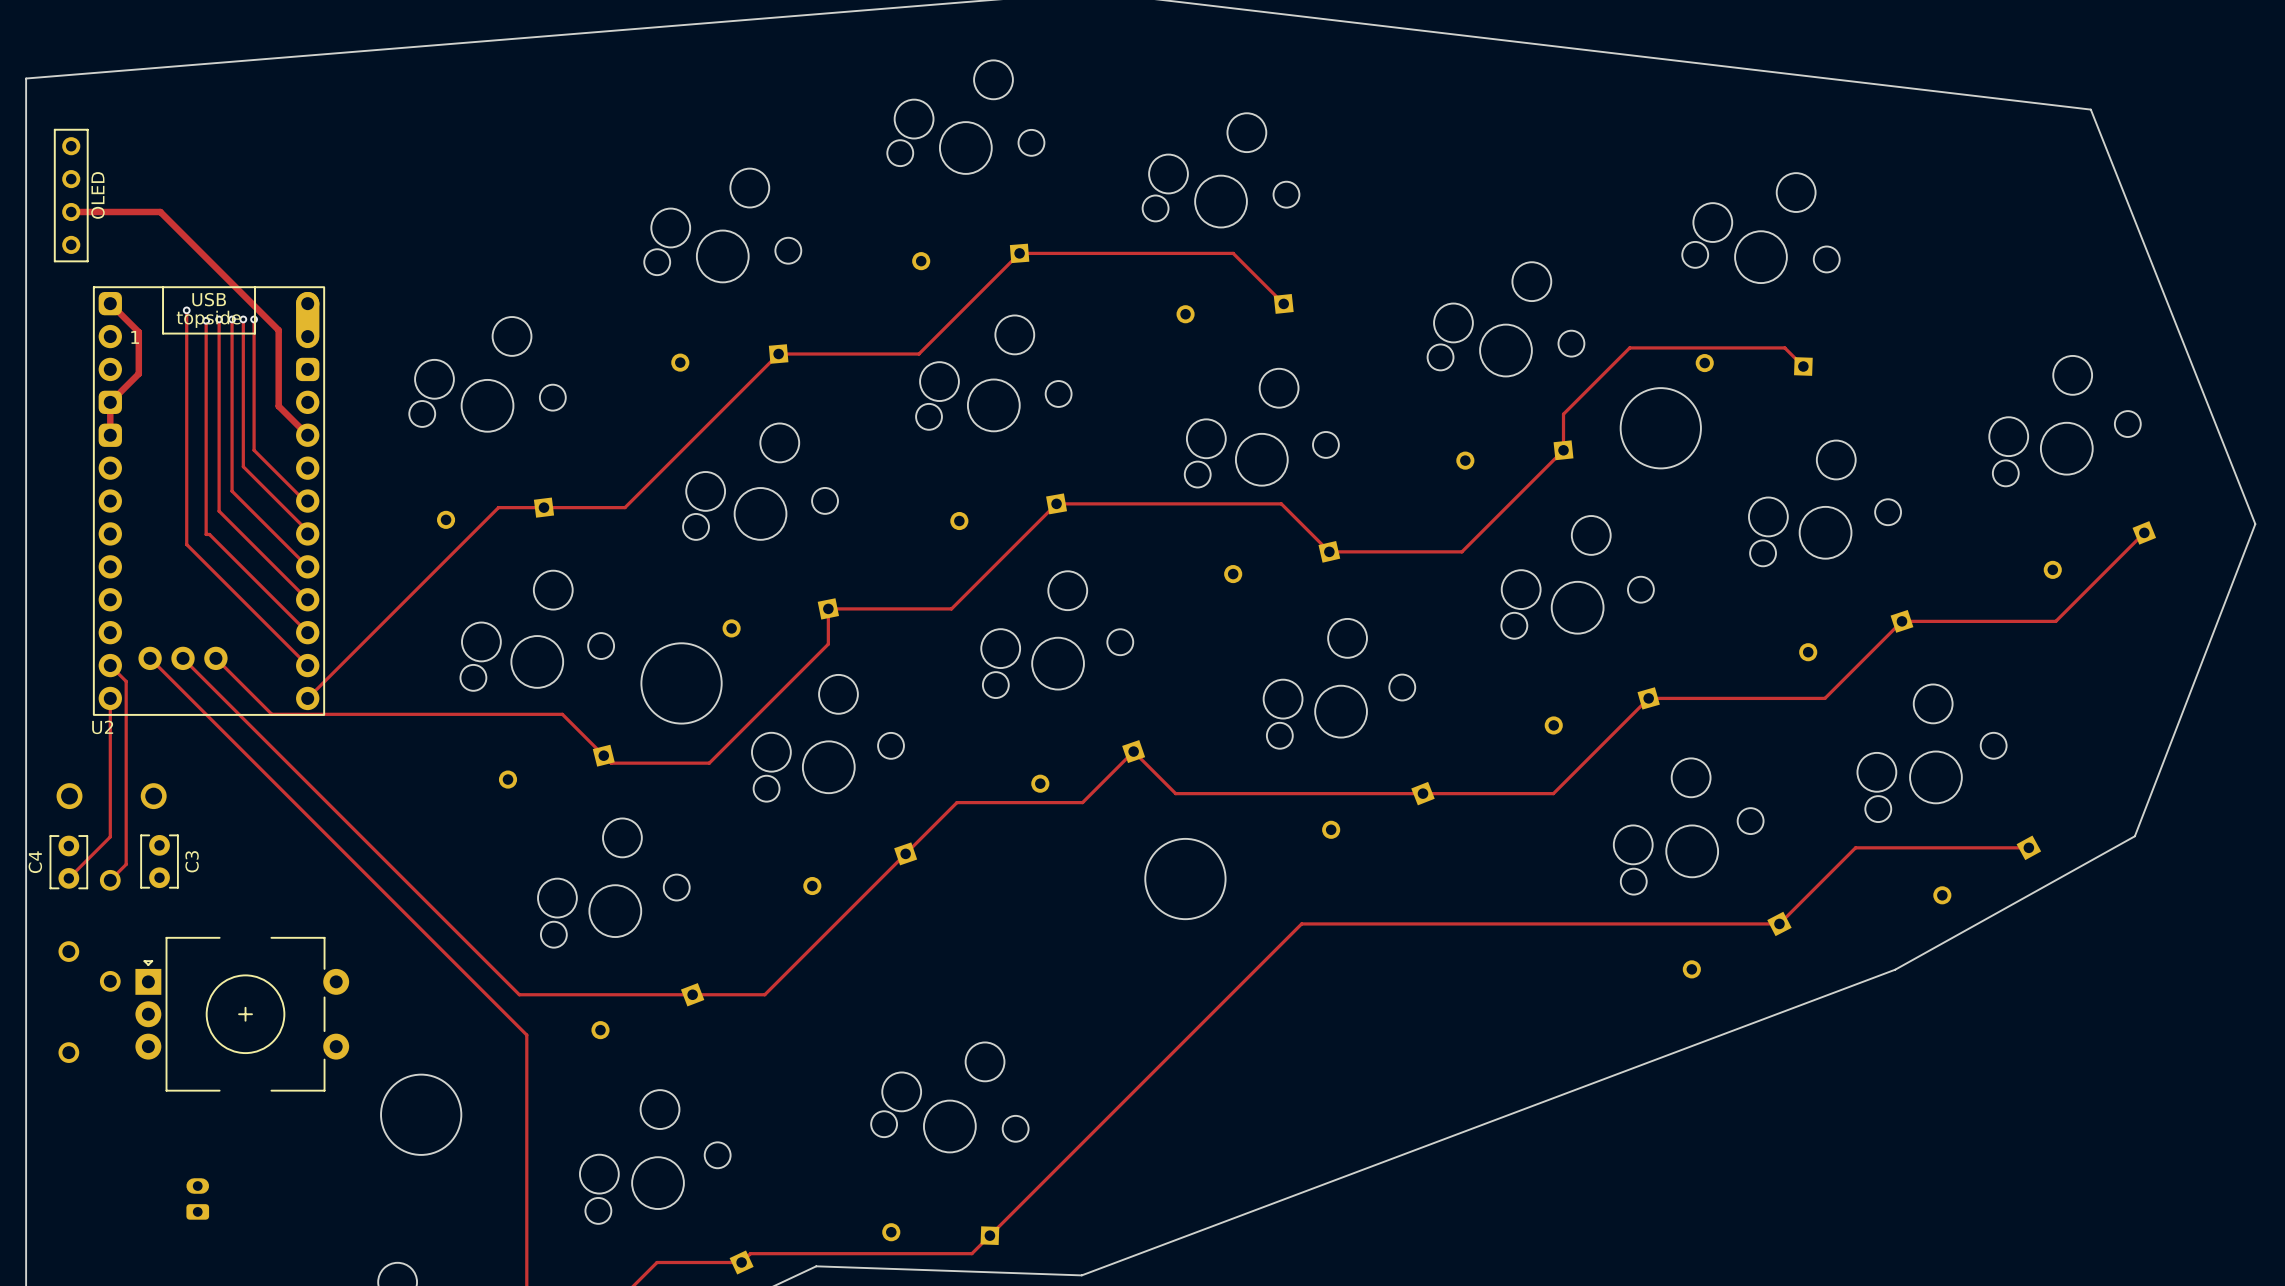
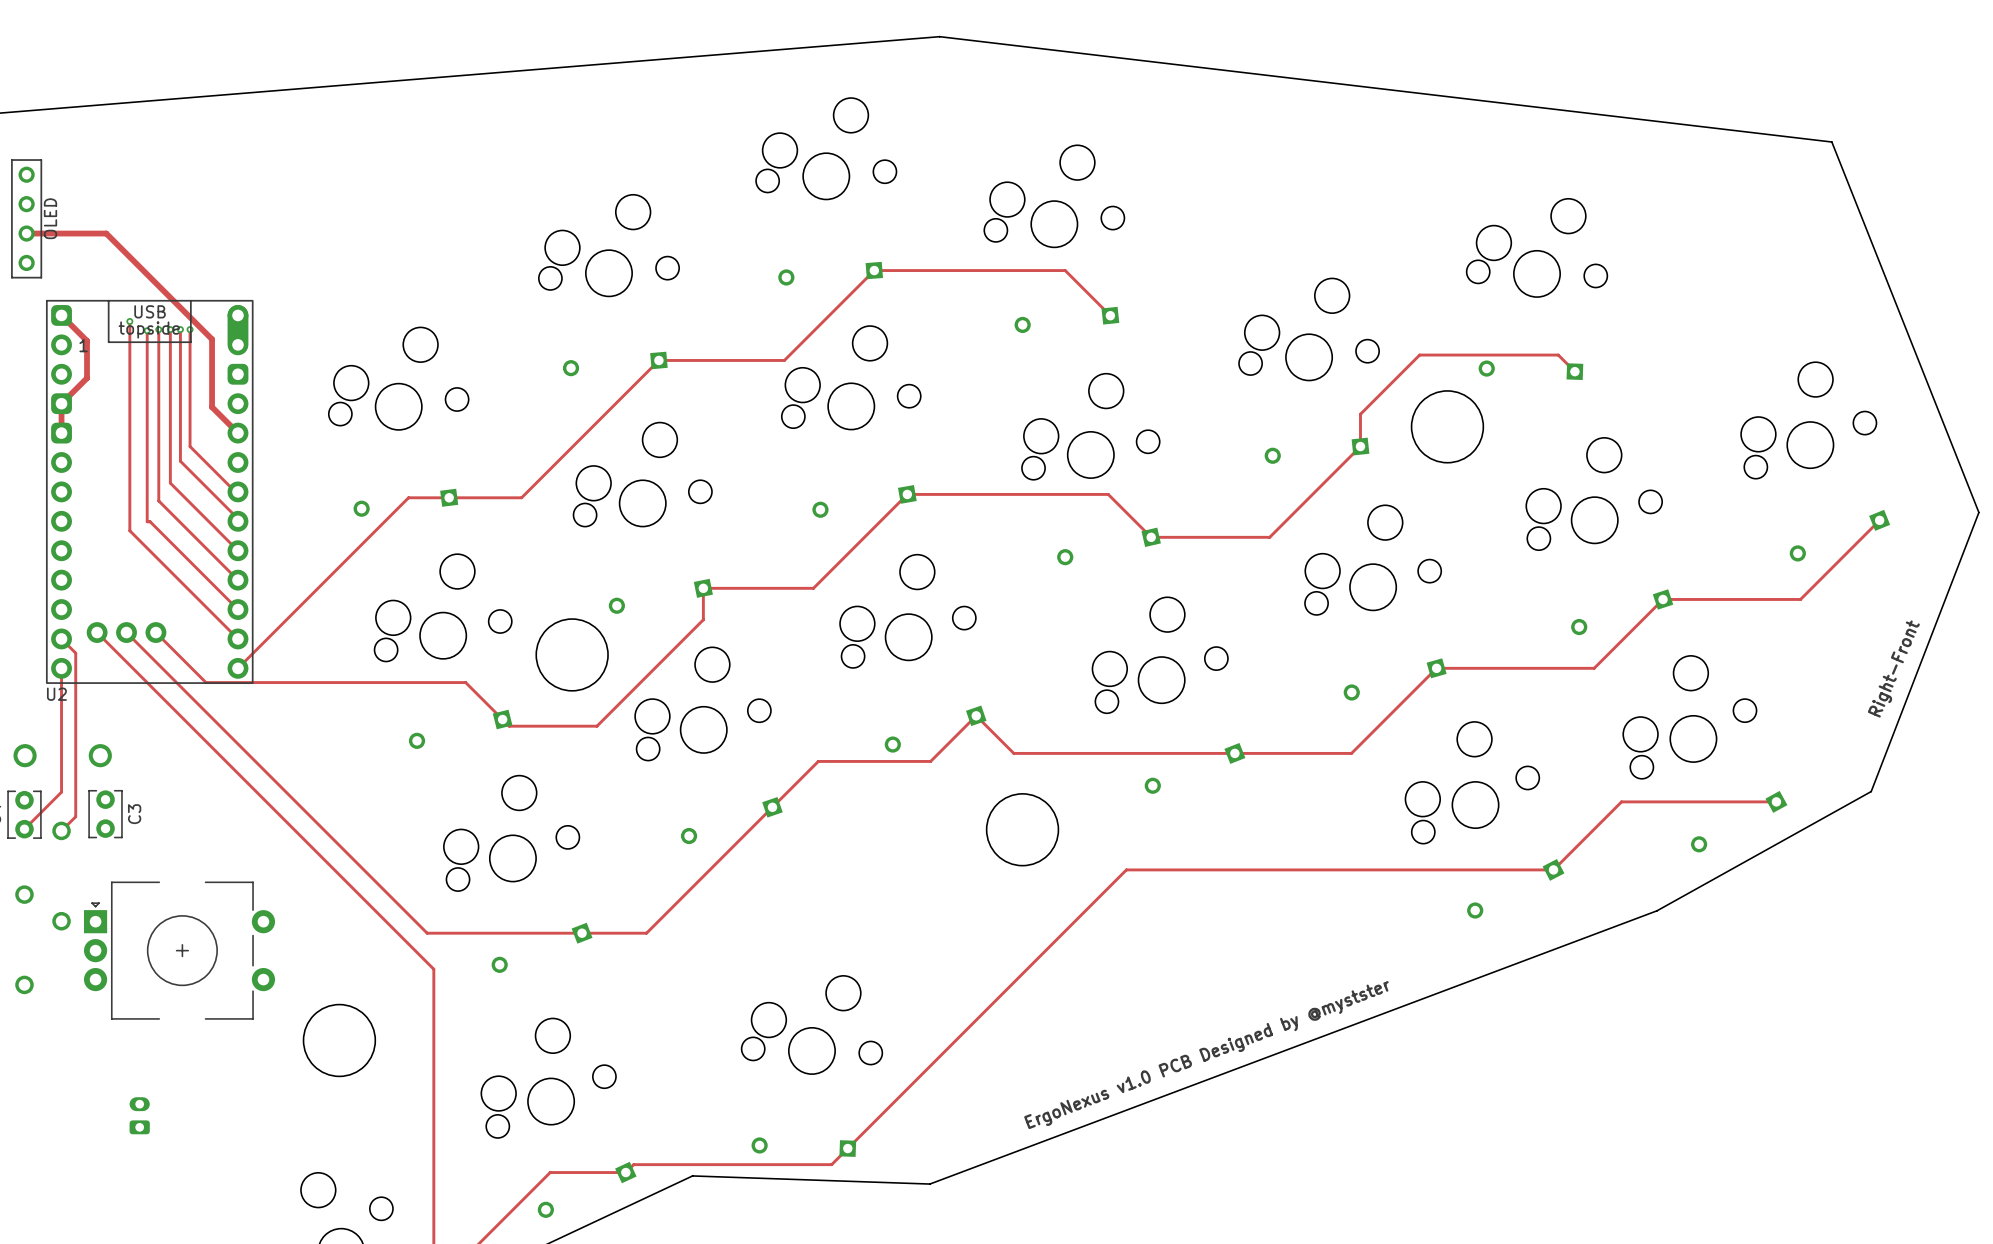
text: none -> Right-Front (1893, 668)
text: none -> ErgoNexus v1.0 PCB Designed by @mystster (1206, 1055)

